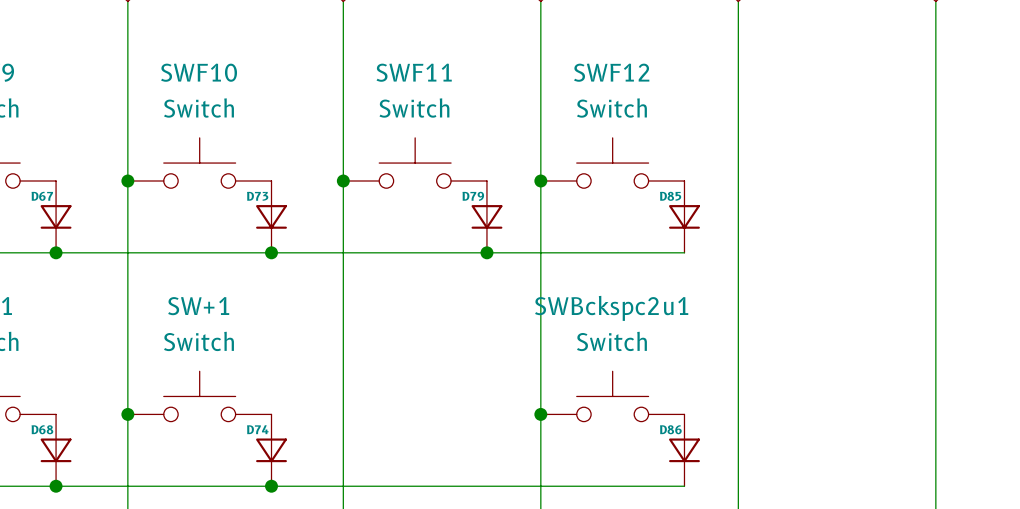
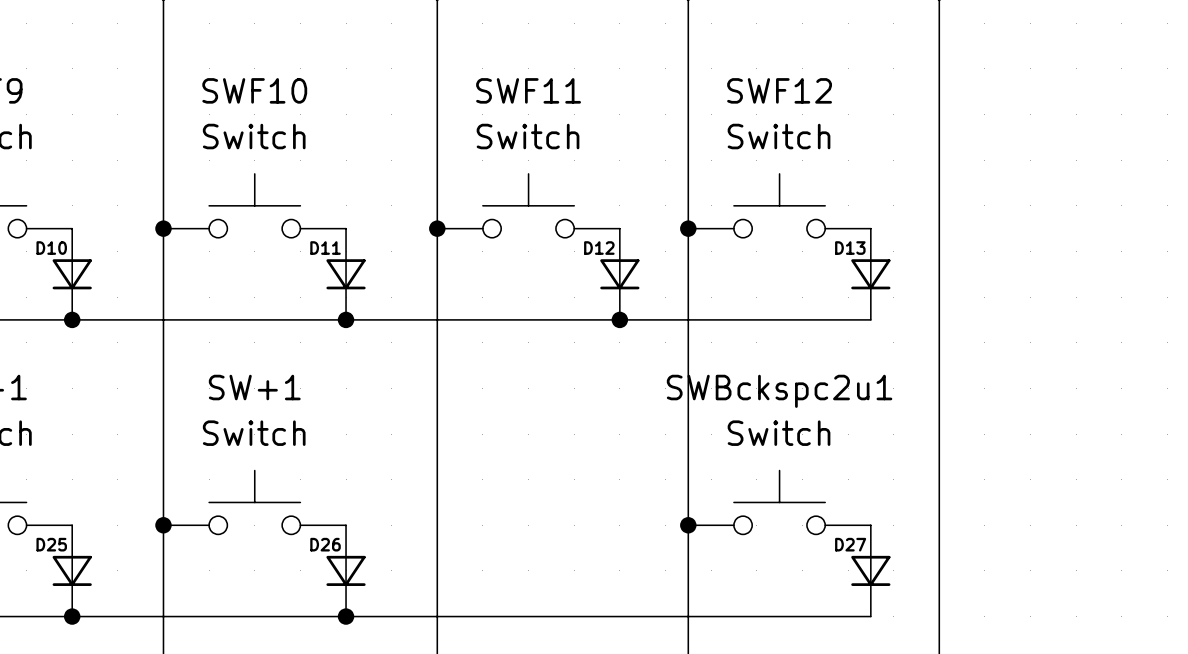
D67 name: D67 (42, 196) -> D10 (51, 248)
D73 name: D73 (257, 196) -> D11 (325, 248)
D79 name: D79 (473, 196) -> D12 (599, 248)
D85 name: D85 (670, 196) -> D13 (850, 248)
D68 name: D68 (42, 429) -> D25 (51, 544)
D74 name: D74 (257, 429) -> D26 (325, 544)
D86 name: D86 (670, 429) -> D27 (850, 544)

